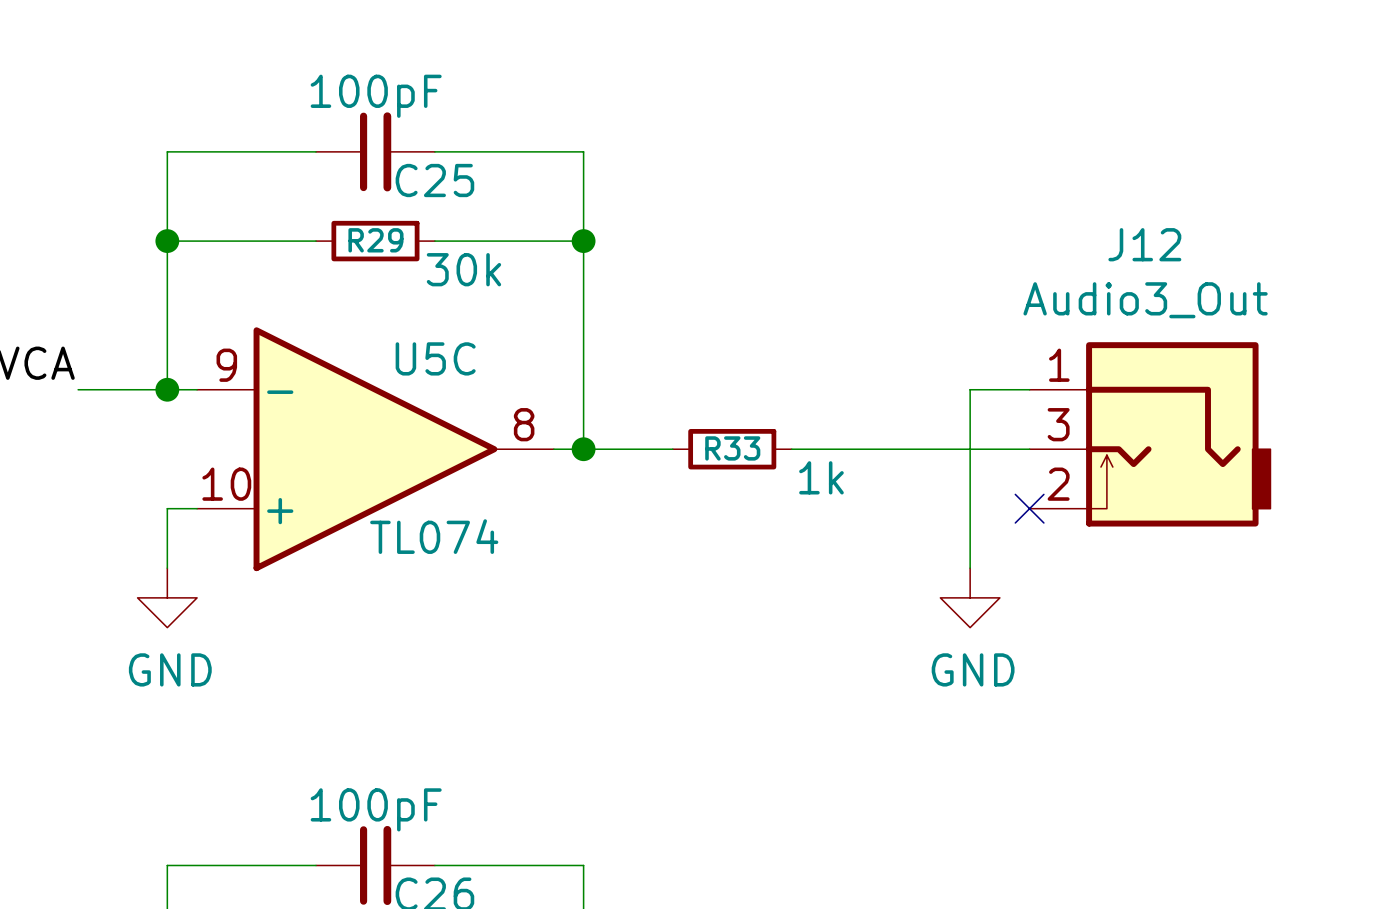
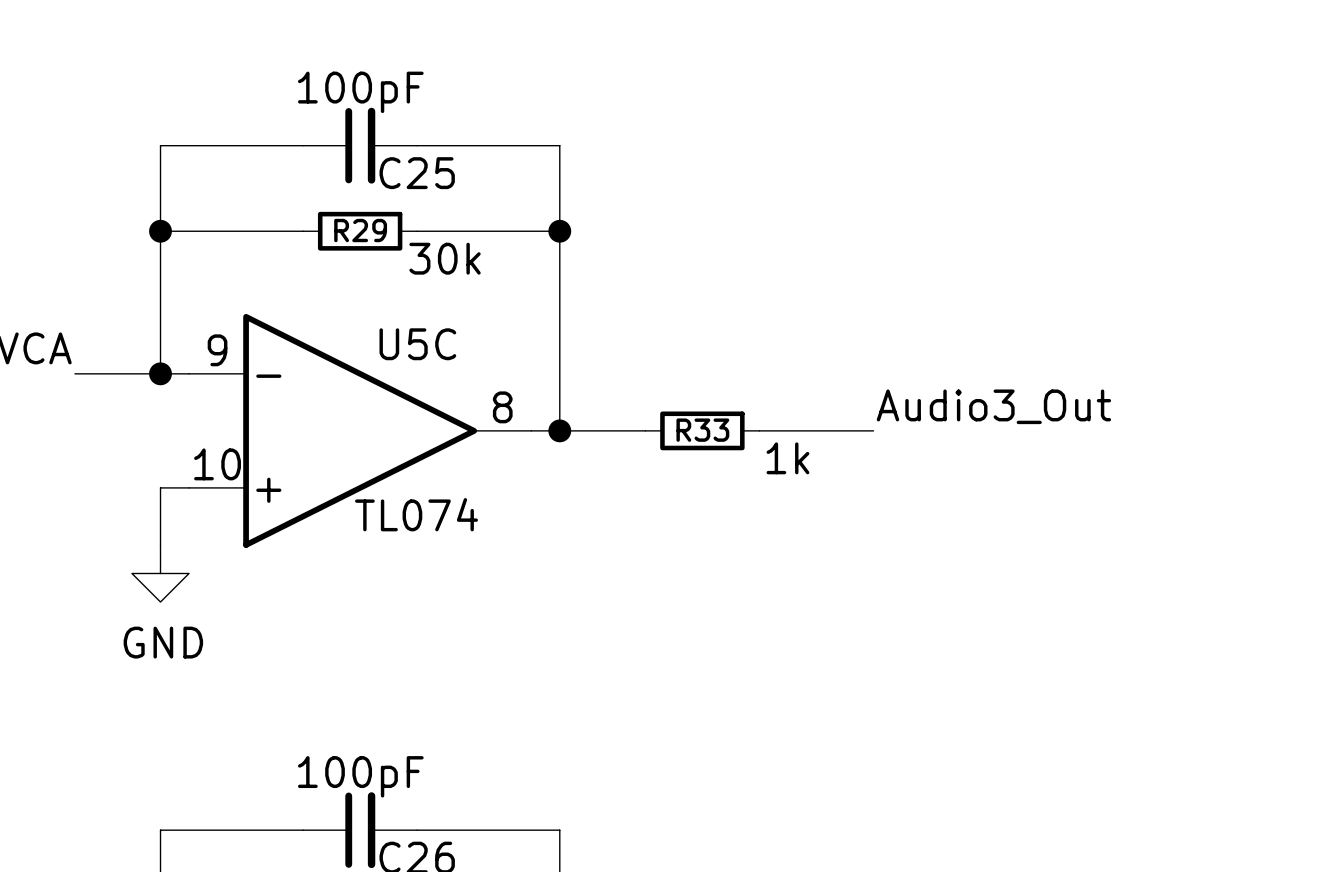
wire: (1029, 389) (970, 389) (970, 568) -> none
label: none -> Audio3_Out (993, 406)
J12: Audio3_Out (1150, 434) -> none
wire: (910, 449) (1029, 449) -> none
no-connect mark: (1029, 508) -> none
power symbol: GND (970, 597) -> none

